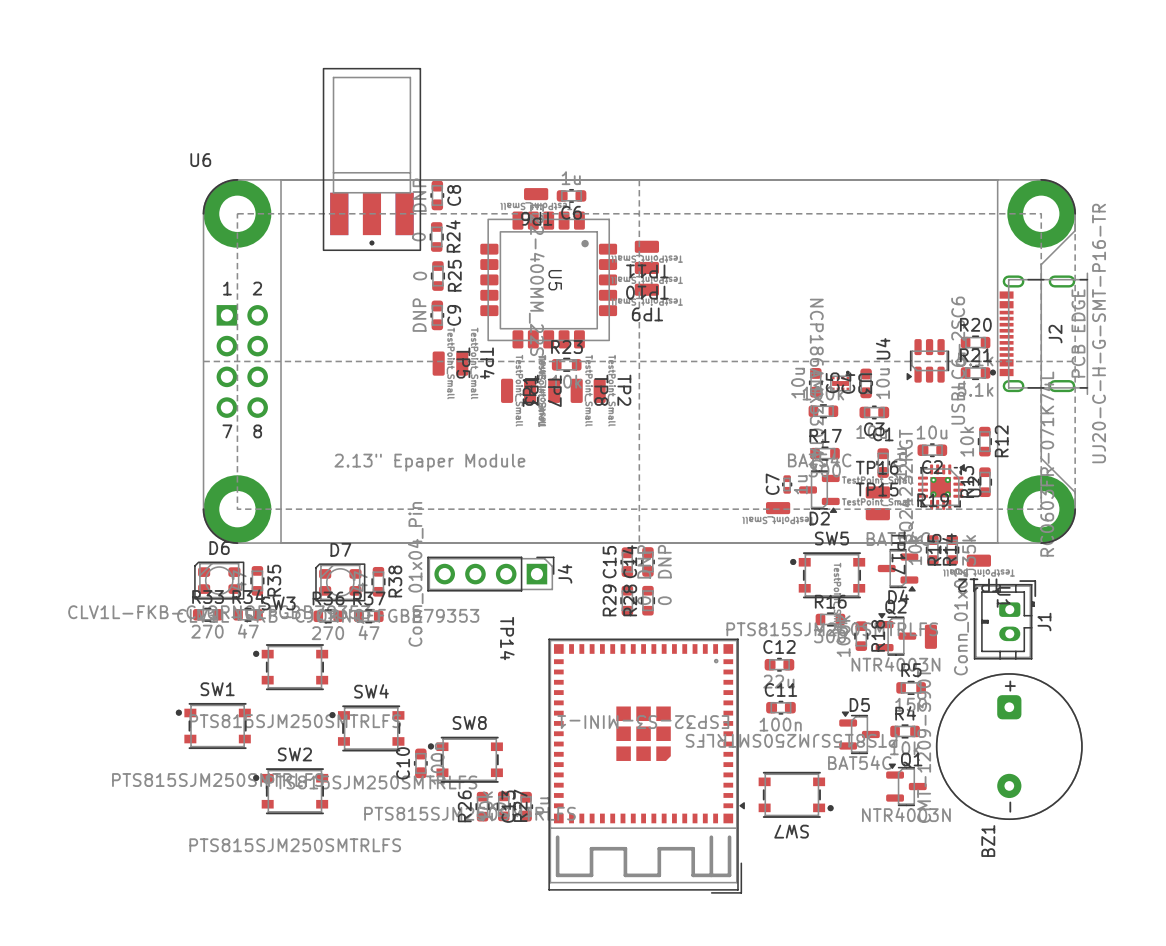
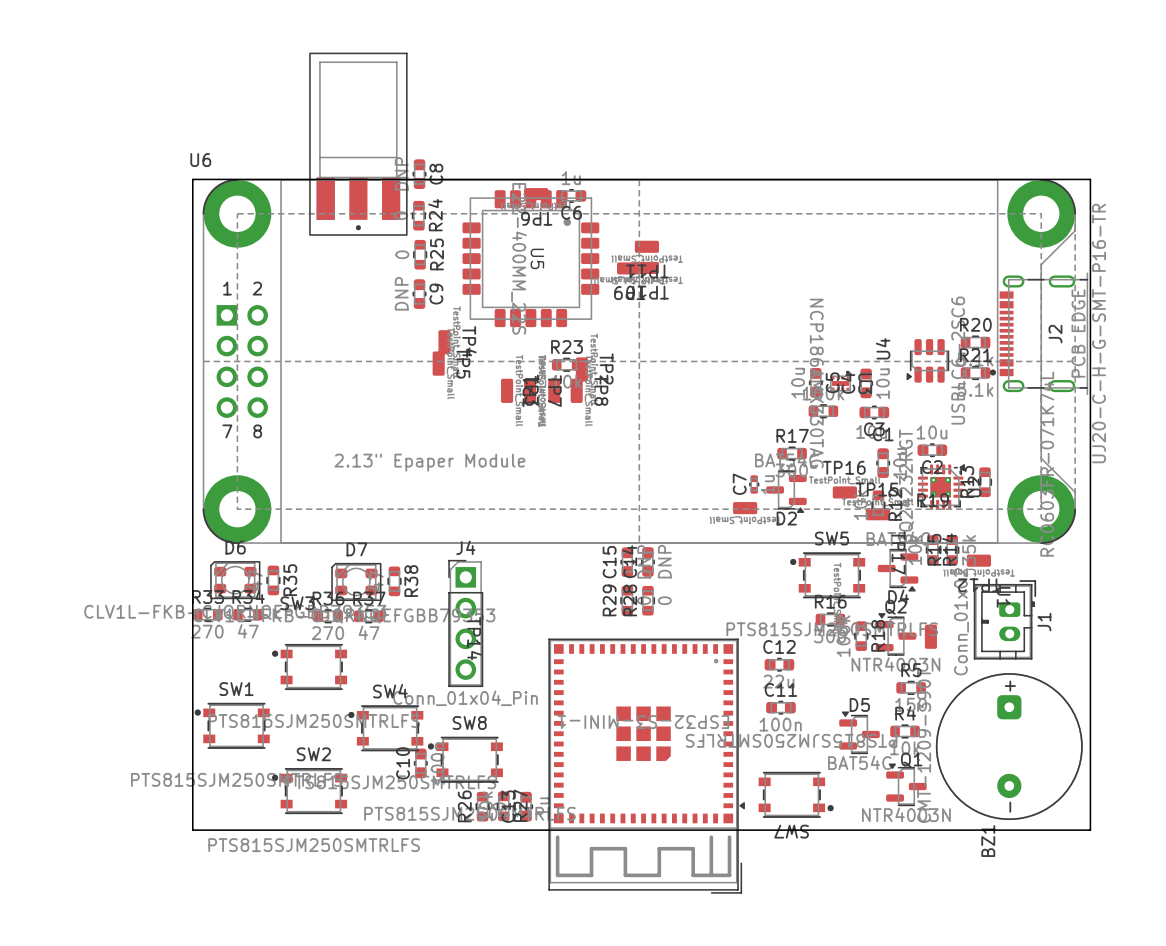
part position: (371, 159) -> (358, 144)
board edge: none -> (192, 179) (1090, 179) (1090, 830) (192, 830) (192, 179)
C8 position: (437, 195) -> (419, 174)
R24 position: (436, 237) -> (418, 215)
R25 position: (437, 276) -> (420, 254)
U5 position: (548, 279) -> (530, 258)
TP9 position: (646, 289) -> (629, 268)
C9 position: (437, 315) -> (419, 294)
TP4 position: (462, 363) -> (444, 342)
TP2 position: (599, 390) -> (581, 369)
R12 position: (984, 441) -> (878, 505)
R17 position: (825, 453) -> (792, 453)
C7 position: (787, 484) -> (754, 484)
D2 position: (819, 491) -> (786, 491)
TP16 position: (877, 492) -> (844, 492)
TP14 position: (778, 508) -> (745, 508)
J4 rotation: 0° (490, 574) -> 90° counterclockwise (465, 623)
D6 position: (219, 580) -> (235, 580)
R35 position: (257, 580) -> (273, 580)
R38 position: (378, 581) -> (394, 581)
D7 position: (340, 582) -> (356, 581)
SW3 position: (290, 667) -> (309, 666)
SW1 position: (213, 726) -> (232, 725)
SW4 position: (366, 728) -> (385, 728)
SW2 position: (290, 791) -> (309, 791)

